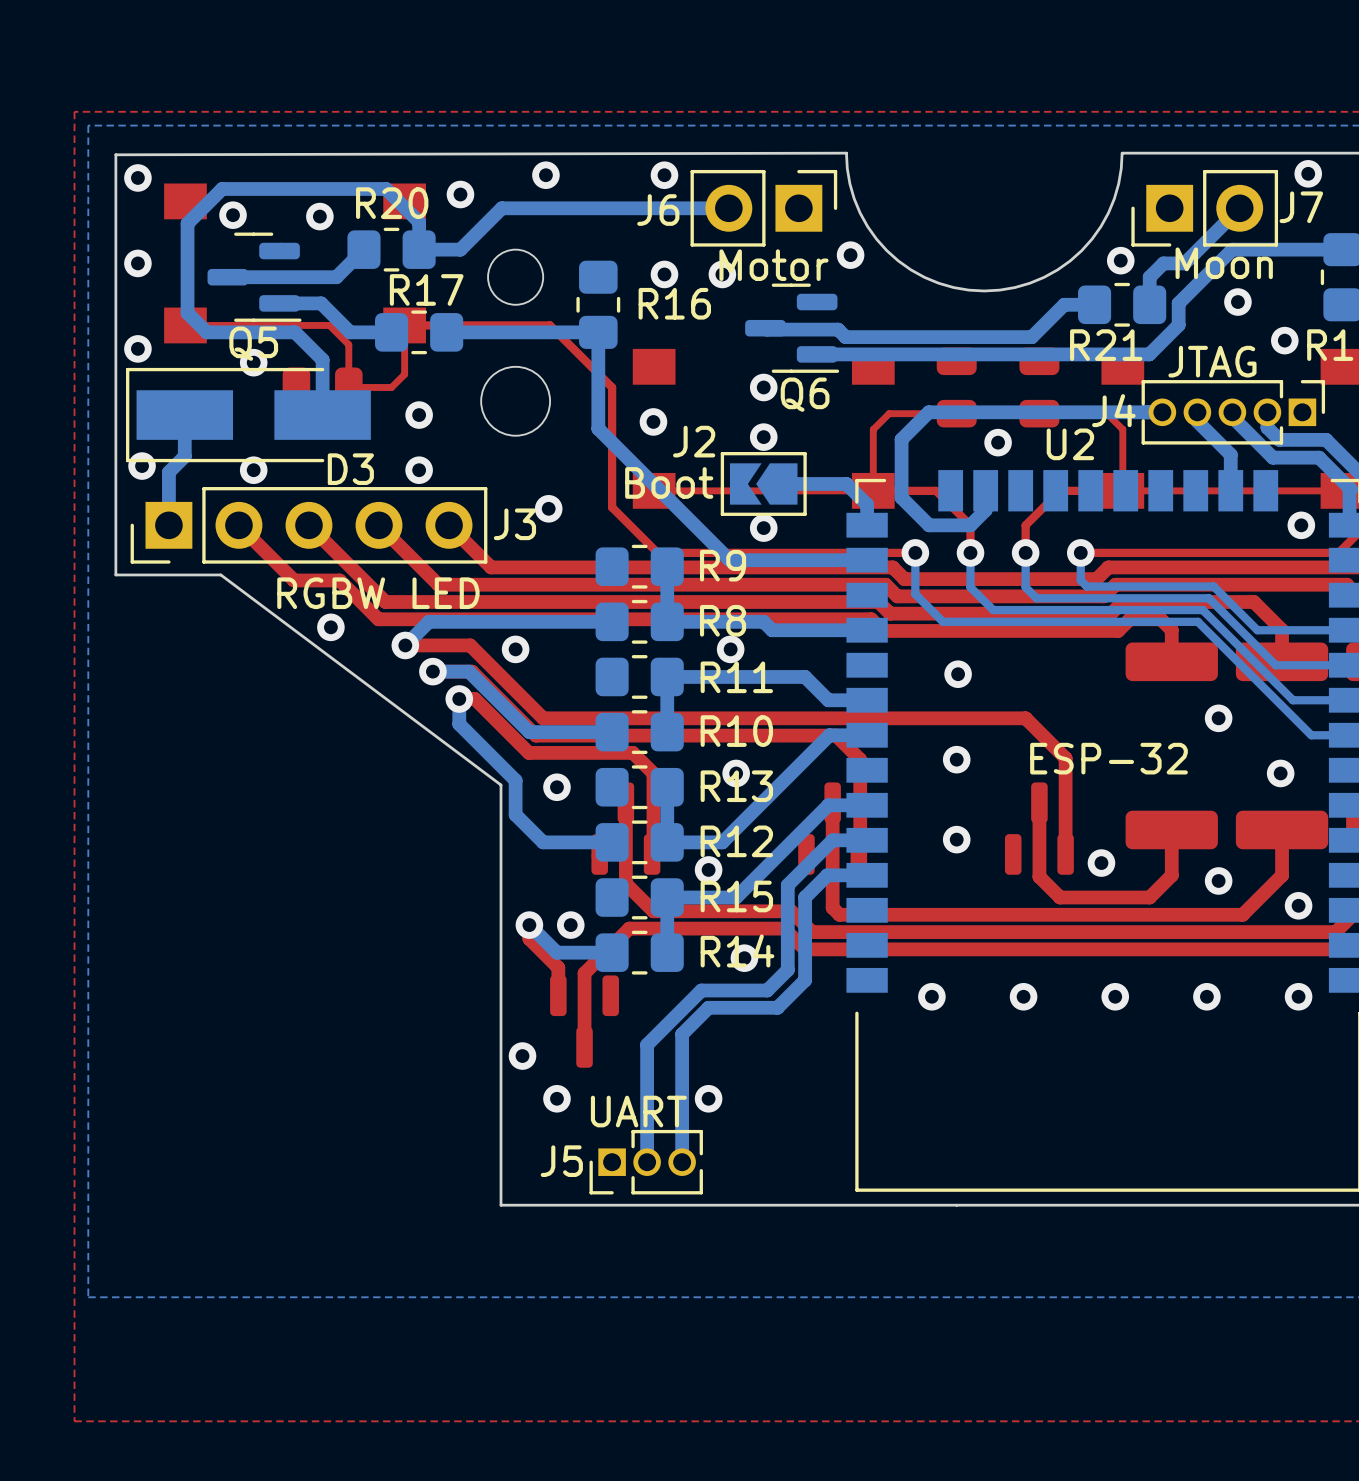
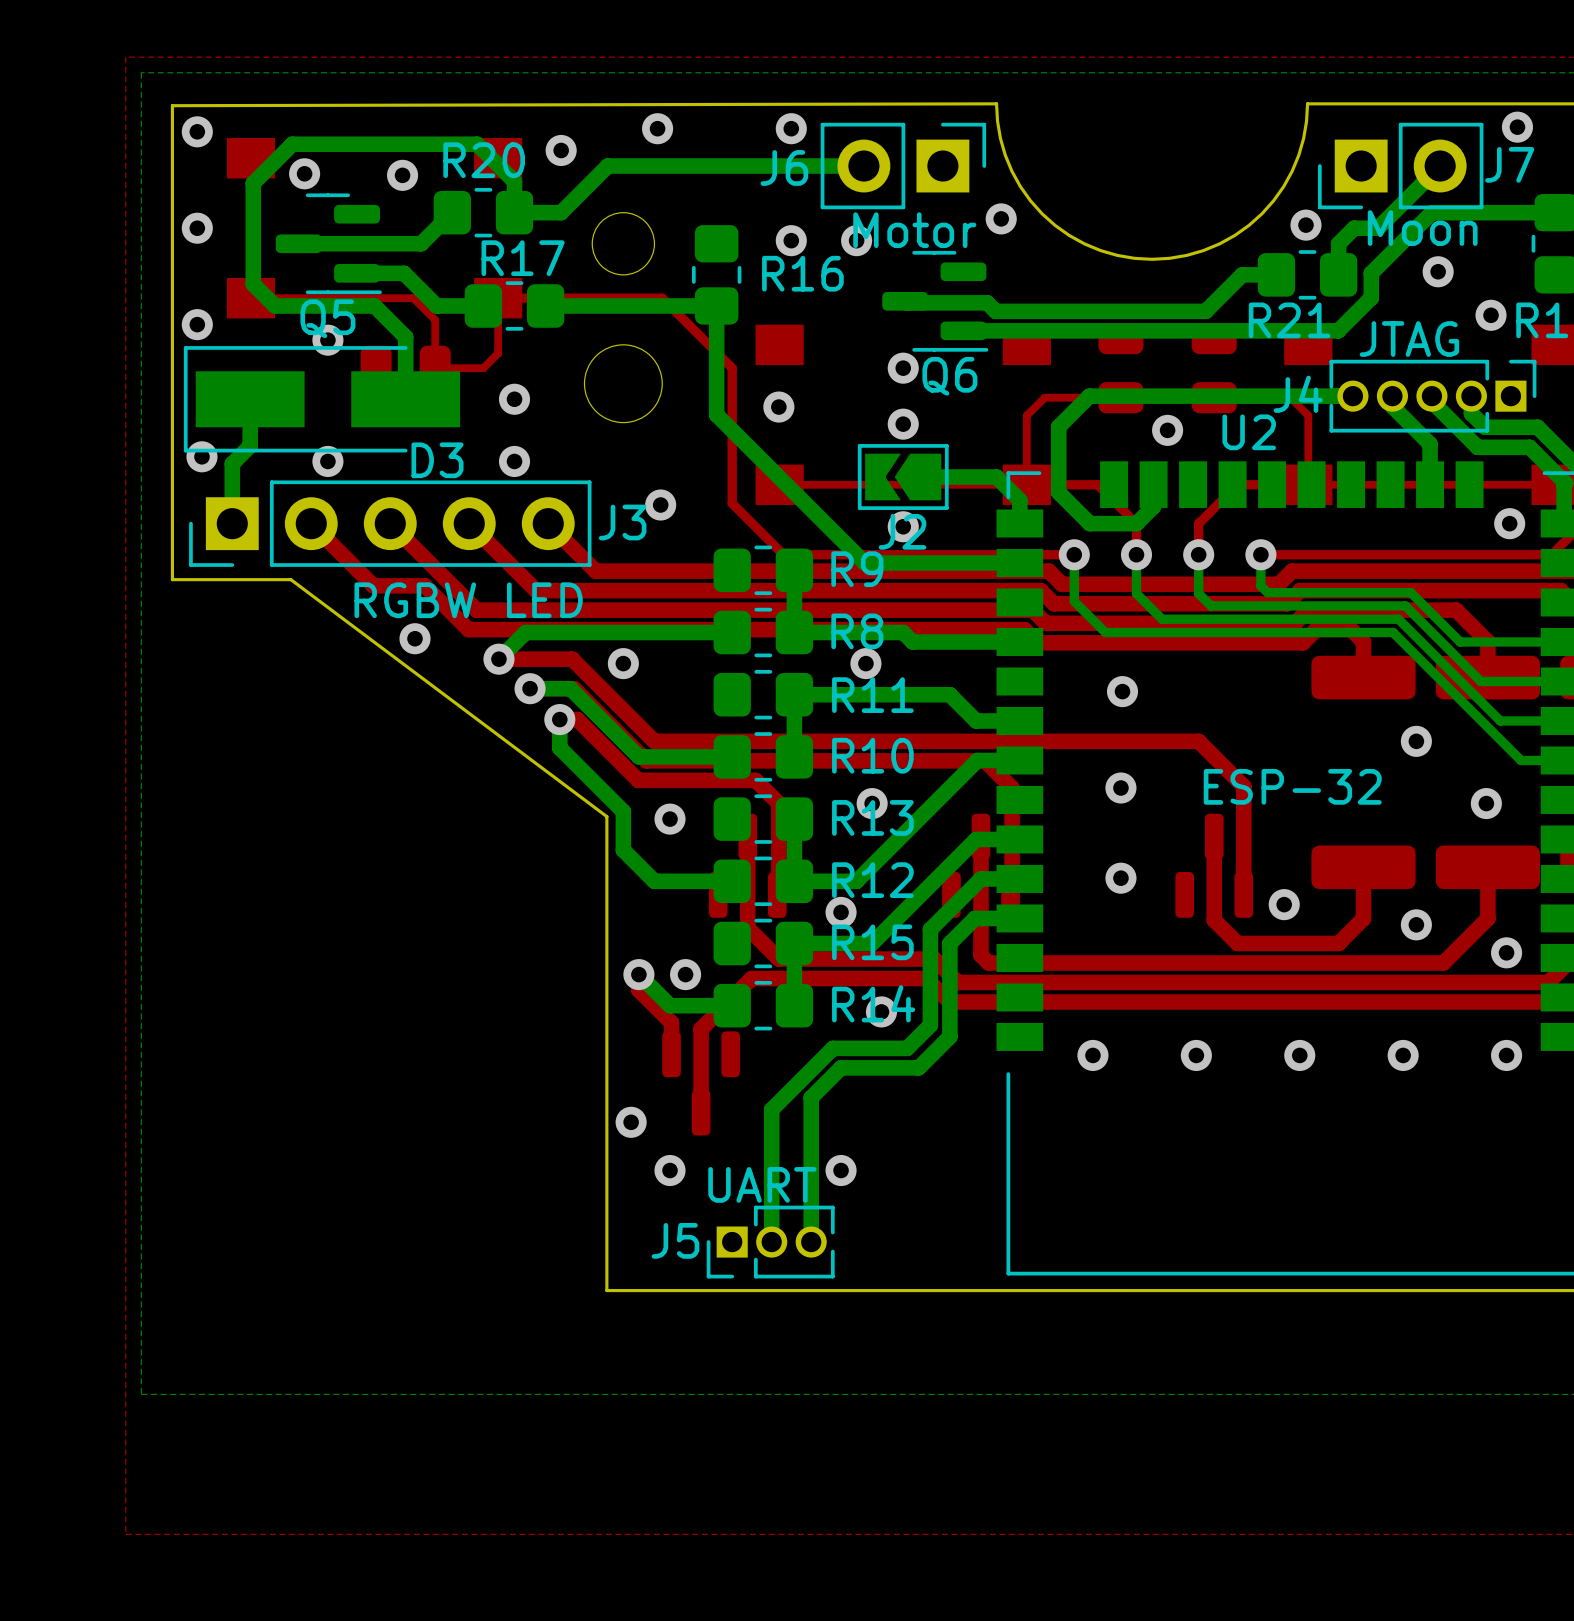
J2 name position: J2 (694, 441) -> J2 (902, 531)
J2 footprint: [720, 452, 807, 516] -> [857, 444, 949, 510]

